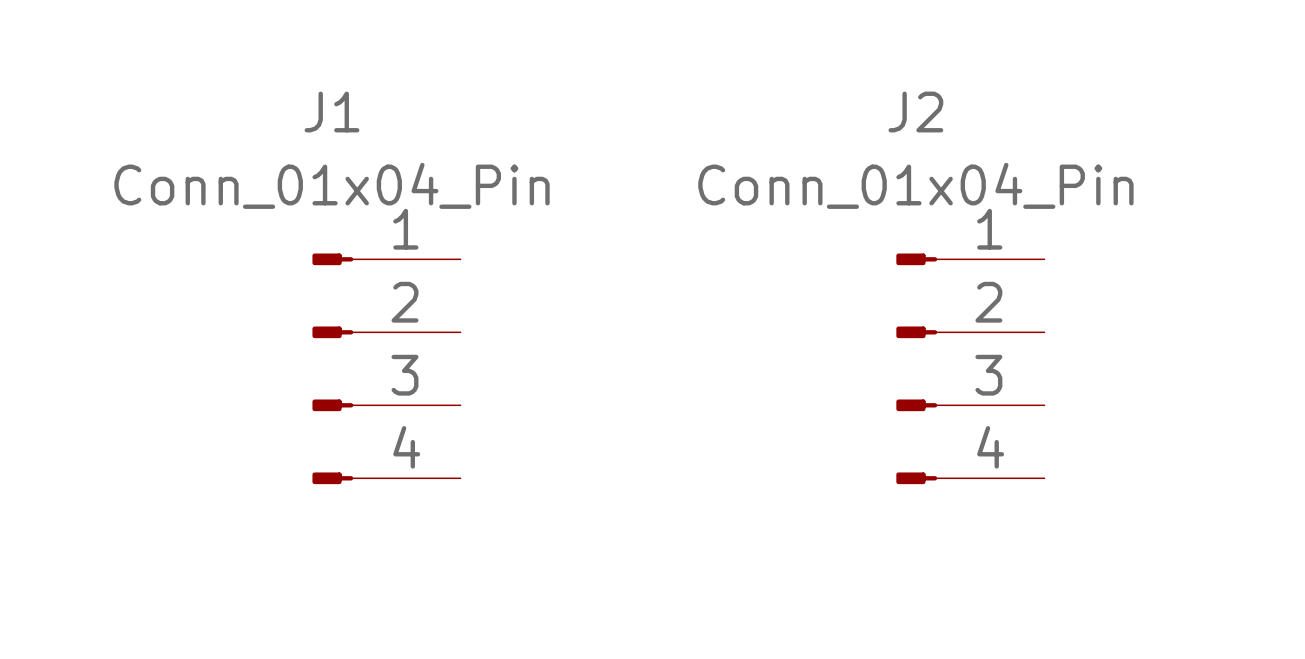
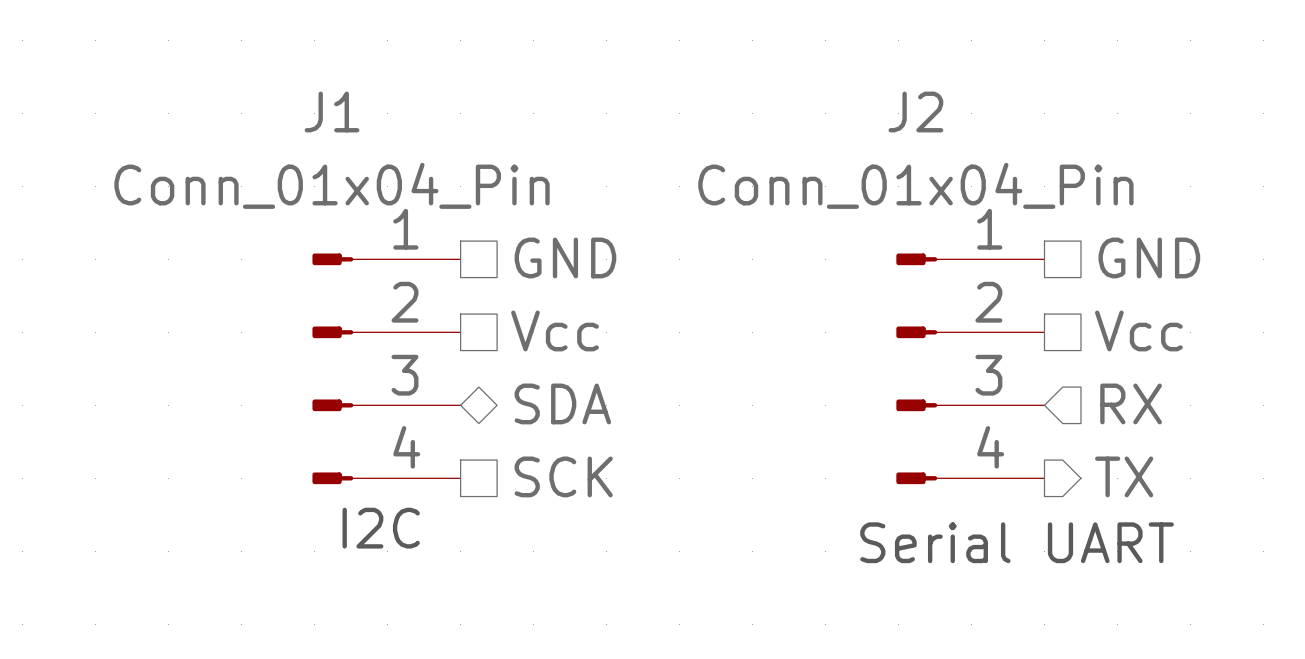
hierarchical label: none -> GND (565, 257)
hierarchical label: none -> GND (1149, 257)
hierarchical label: none -> Vcc (555, 330)
hierarchical label: none -> Vcc (1138, 330)
hierarchical label: none -> SDA (562, 403)
hierarchical label: none -> RX (1131, 403)
hierarchical label: none -> SCK (563, 476)
hierarchical label: none -> TX (1124, 476)
text: none -> I2C (381, 528)
text: none -> Serial UART (1017, 542)

